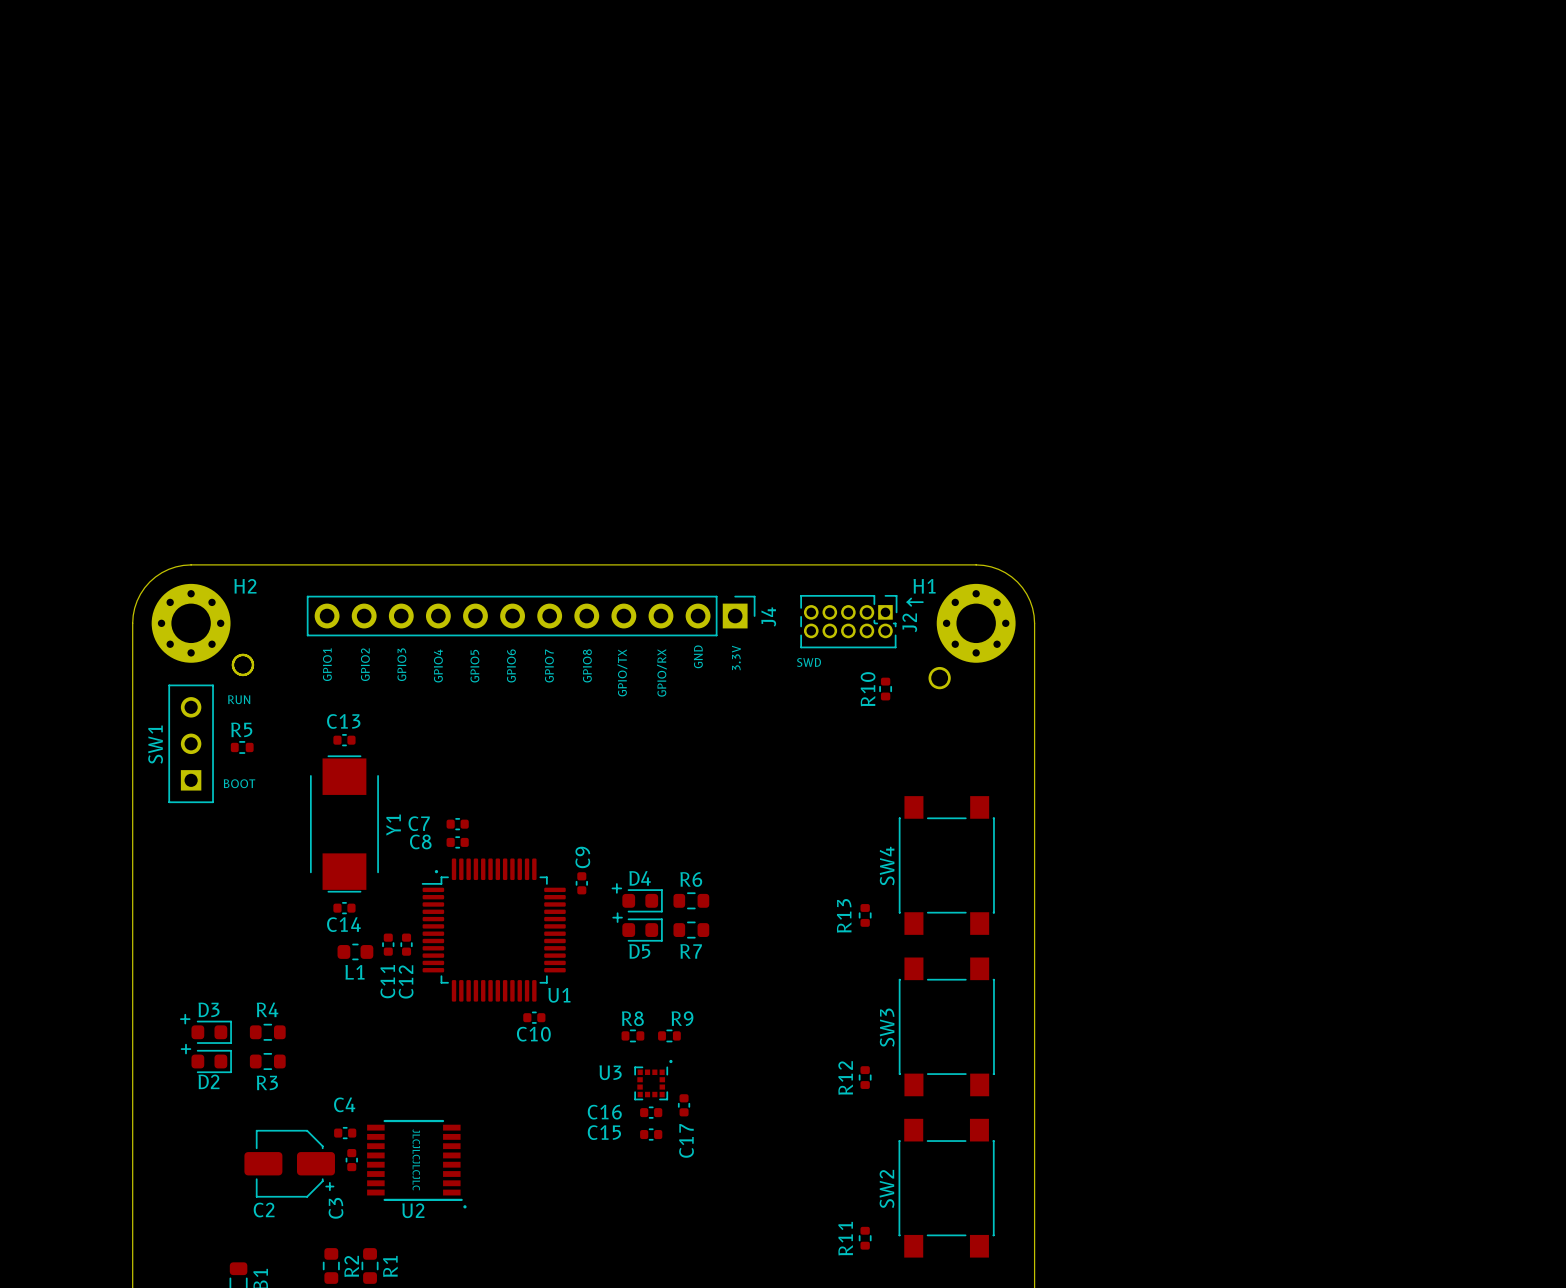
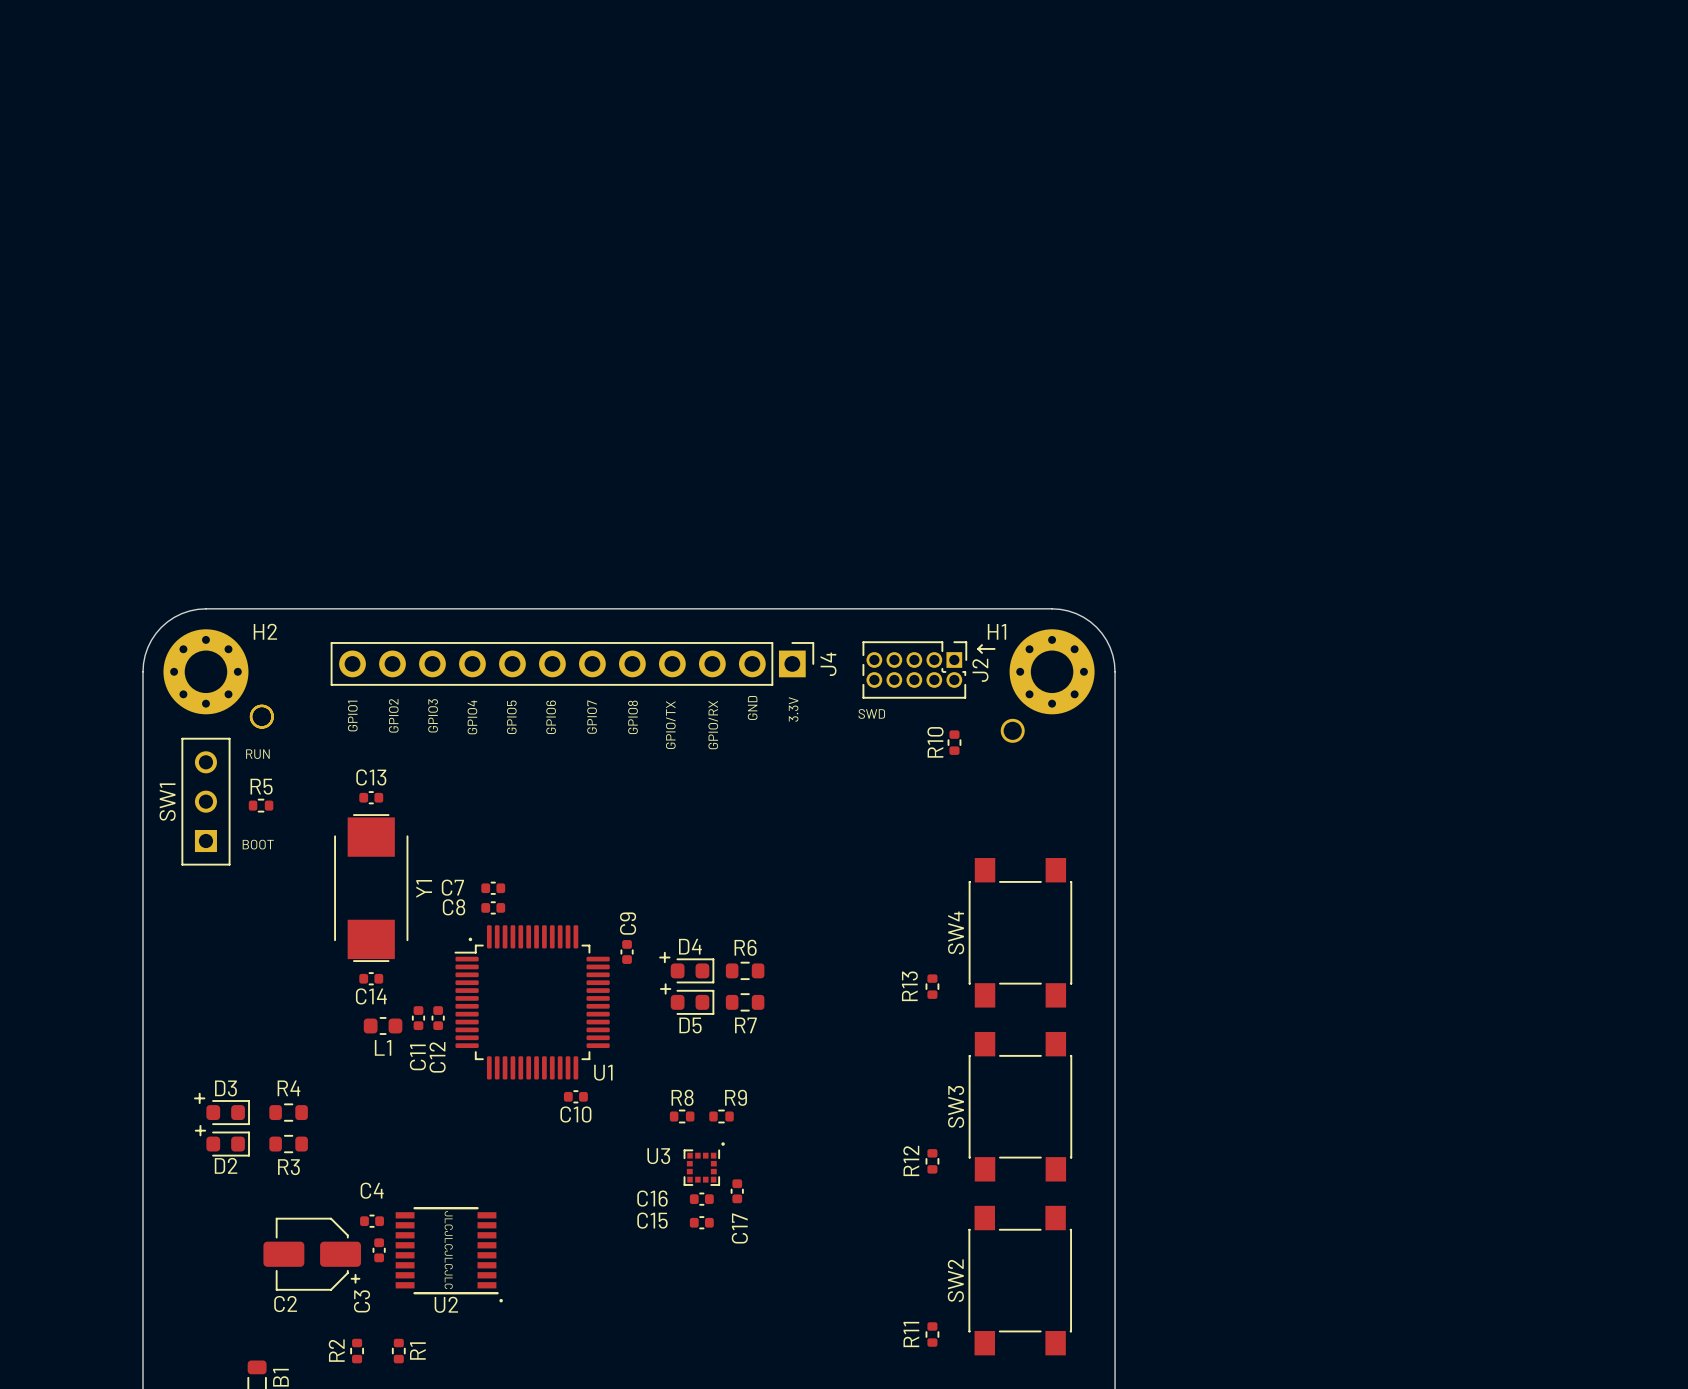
R2 footprint: [322, 1248, 340, 1284] -> [350, 1338, 365, 1364]
R1 footprint: [361, 1248, 379, 1284] -> [391, 1338, 406, 1364]
R2 name position: R2 (351, 1266) -> R2 (336, 1350)

